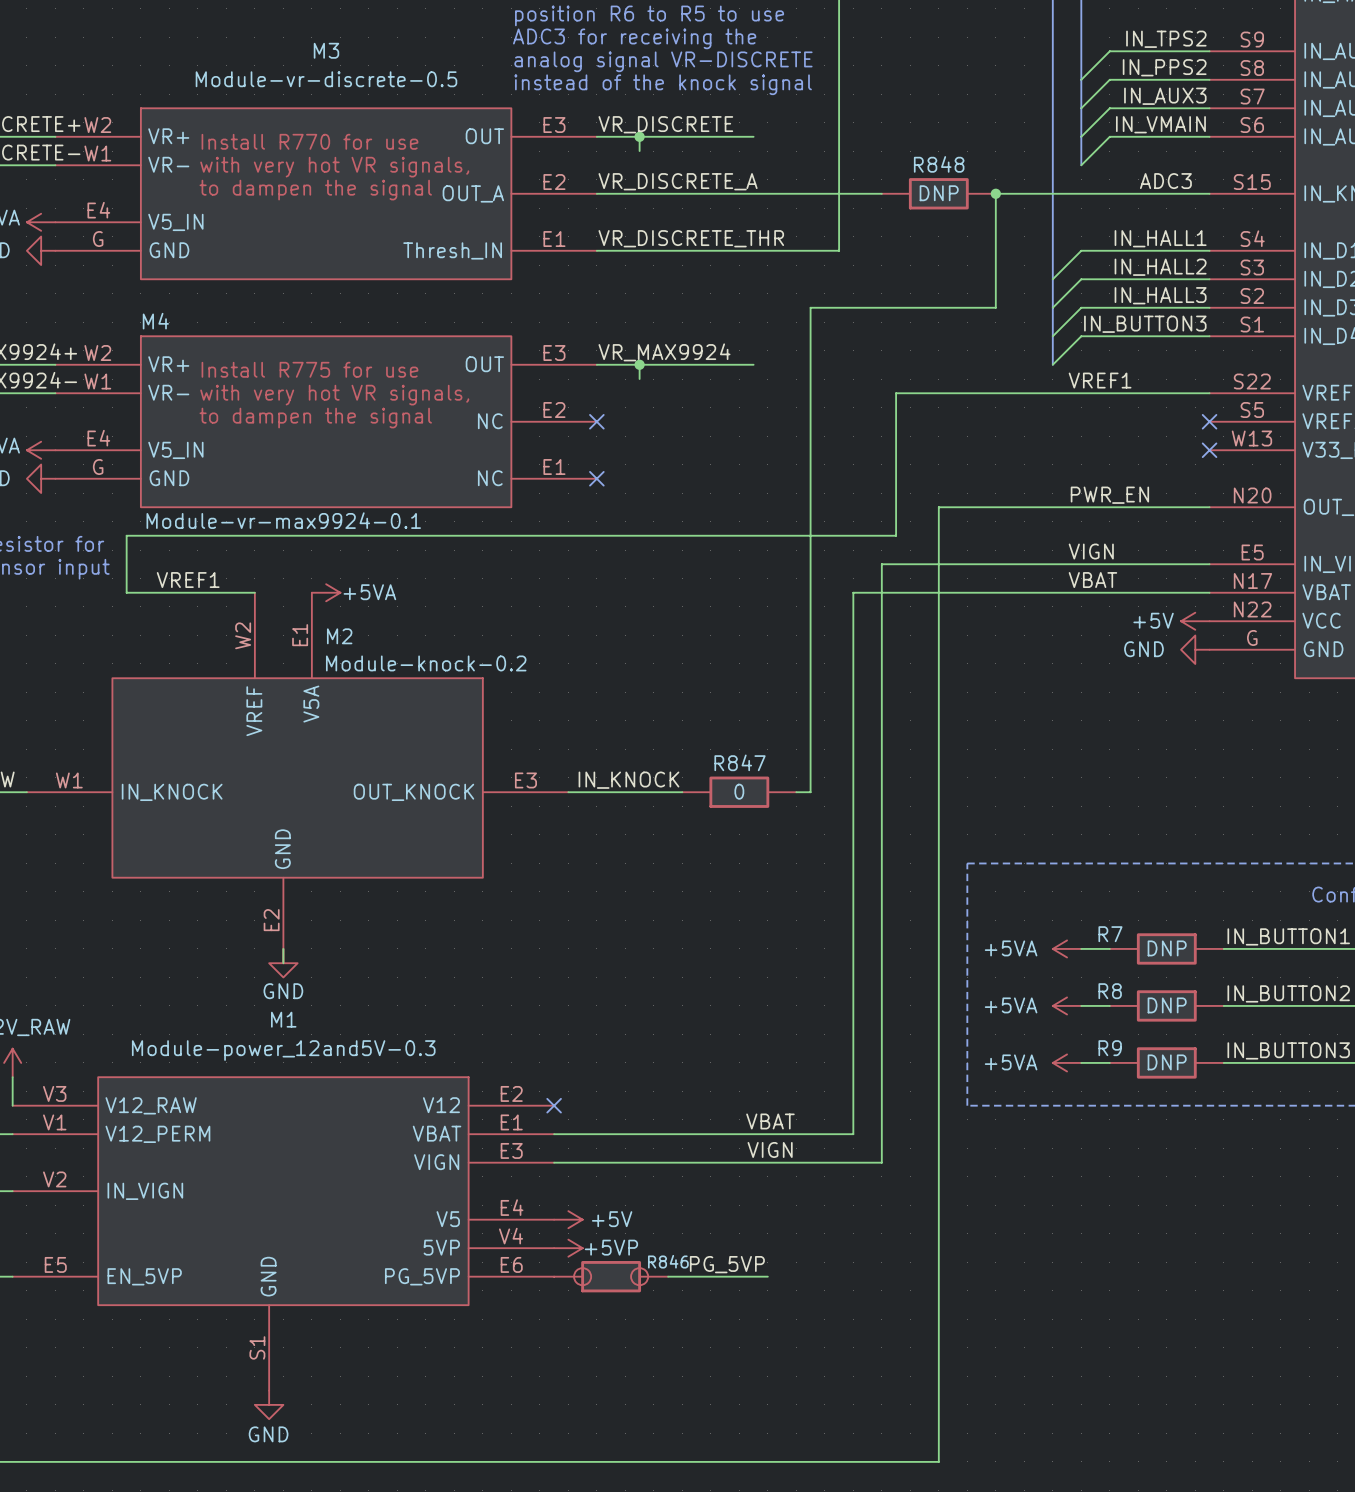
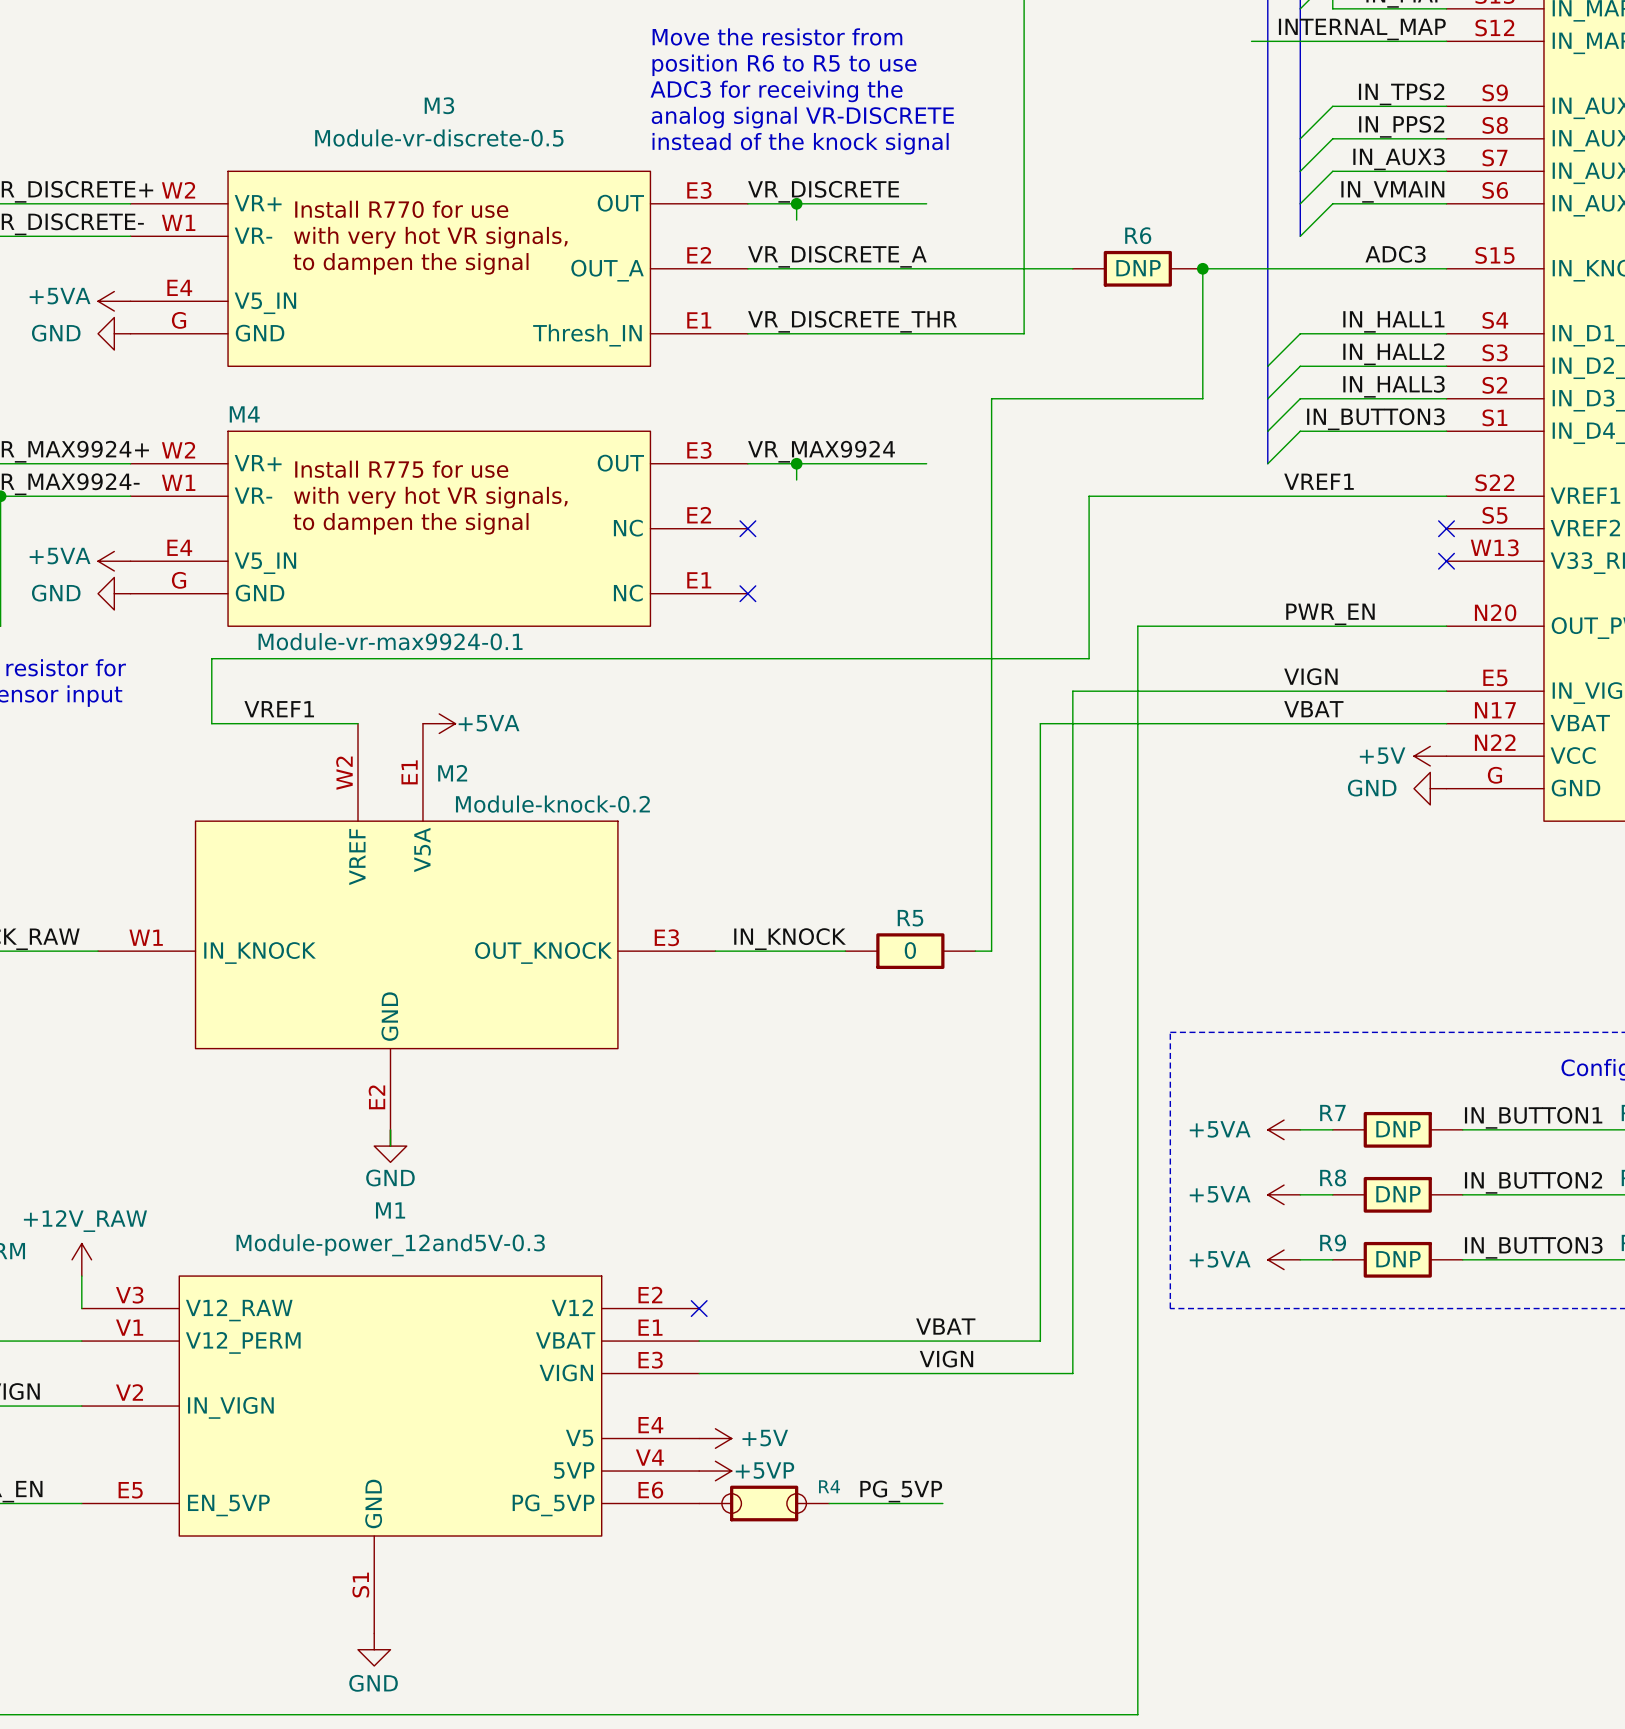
R848 name: R848 (939, 164) -> R6 (1138, 235)
R847 name: R847 (740, 762) -> R5 (910, 918)
R846 name: R846 (668, 1261) -> R4 (829, 1486)

